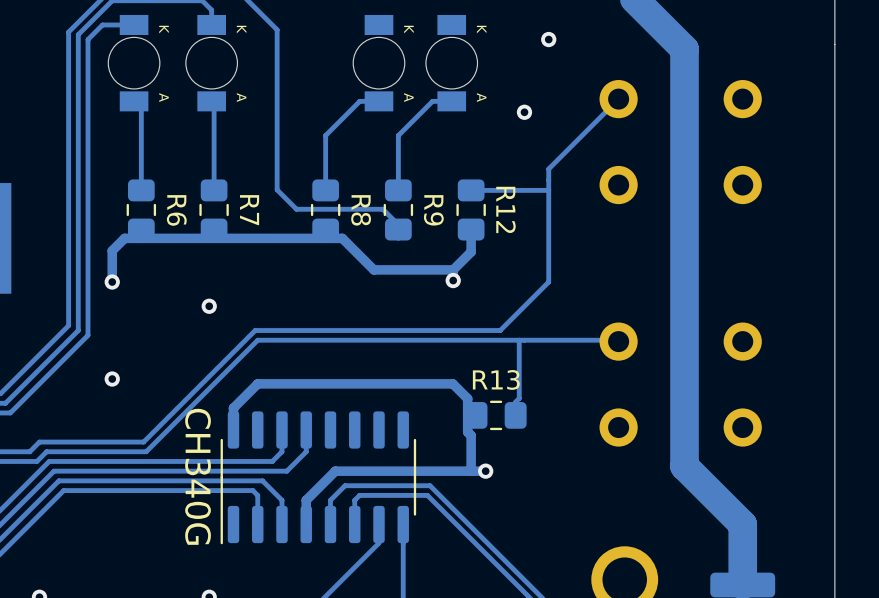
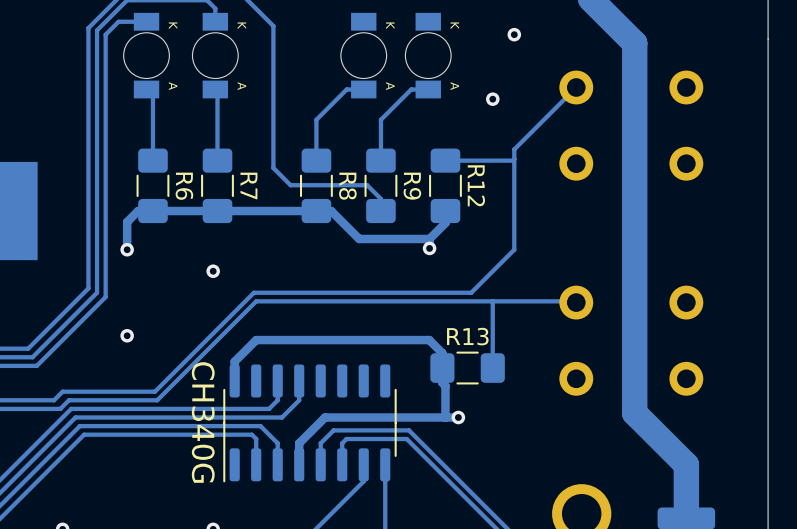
R6 footprint: [126, 179, 157, 241] -> [136, 148, 170, 224]
R7 footprint: [199, 179, 229, 241] -> [201, 148, 234, 224]
R8 footprint: [310, 179, 341, 241] -> [300, 148, 333, 224]
R9 footprint: [383, 179, 414, 241] -> [364, 148, 398, 224]
R12 footprint: [456, 179, 486, 241] -> [429, 148, 462, 224]
track: none -> (514, 159) (445, 160)
track: (548, 189) (471, 190) -> none
track: (519, 340) (519, 398) (515, 402) (515, 415) -> none
track: none -> (492, 301) (492, 368)
R13 footprint: [465, 400, 527, 431] -> [430, 351, 505, 385]

